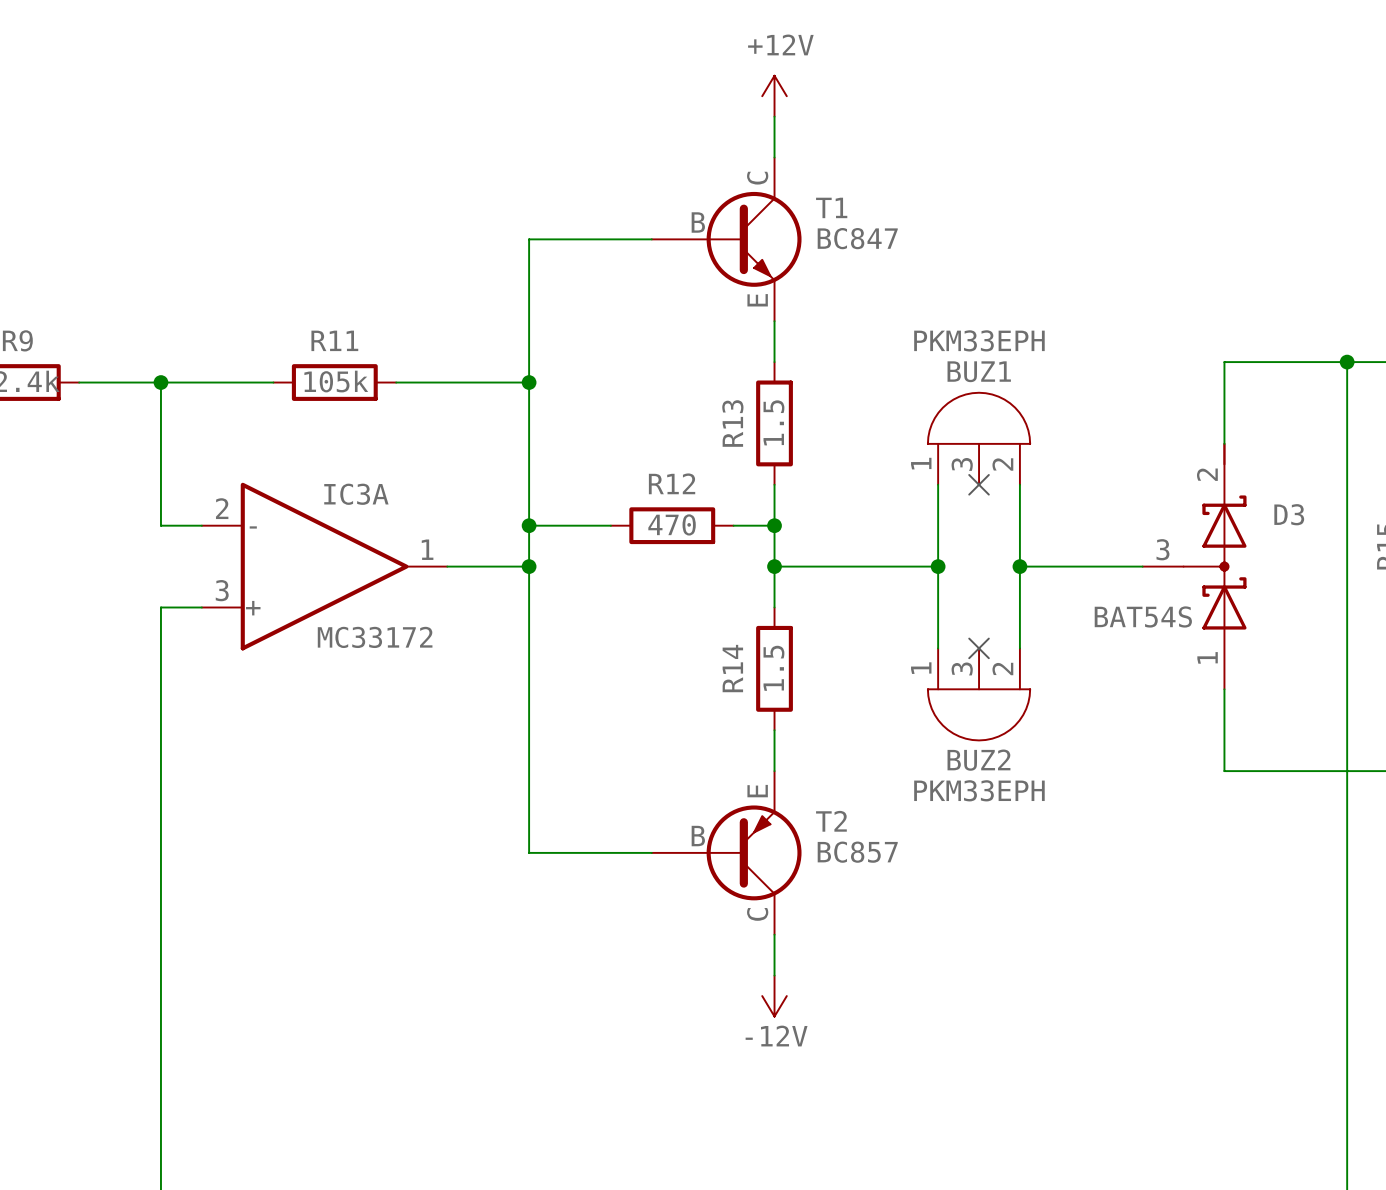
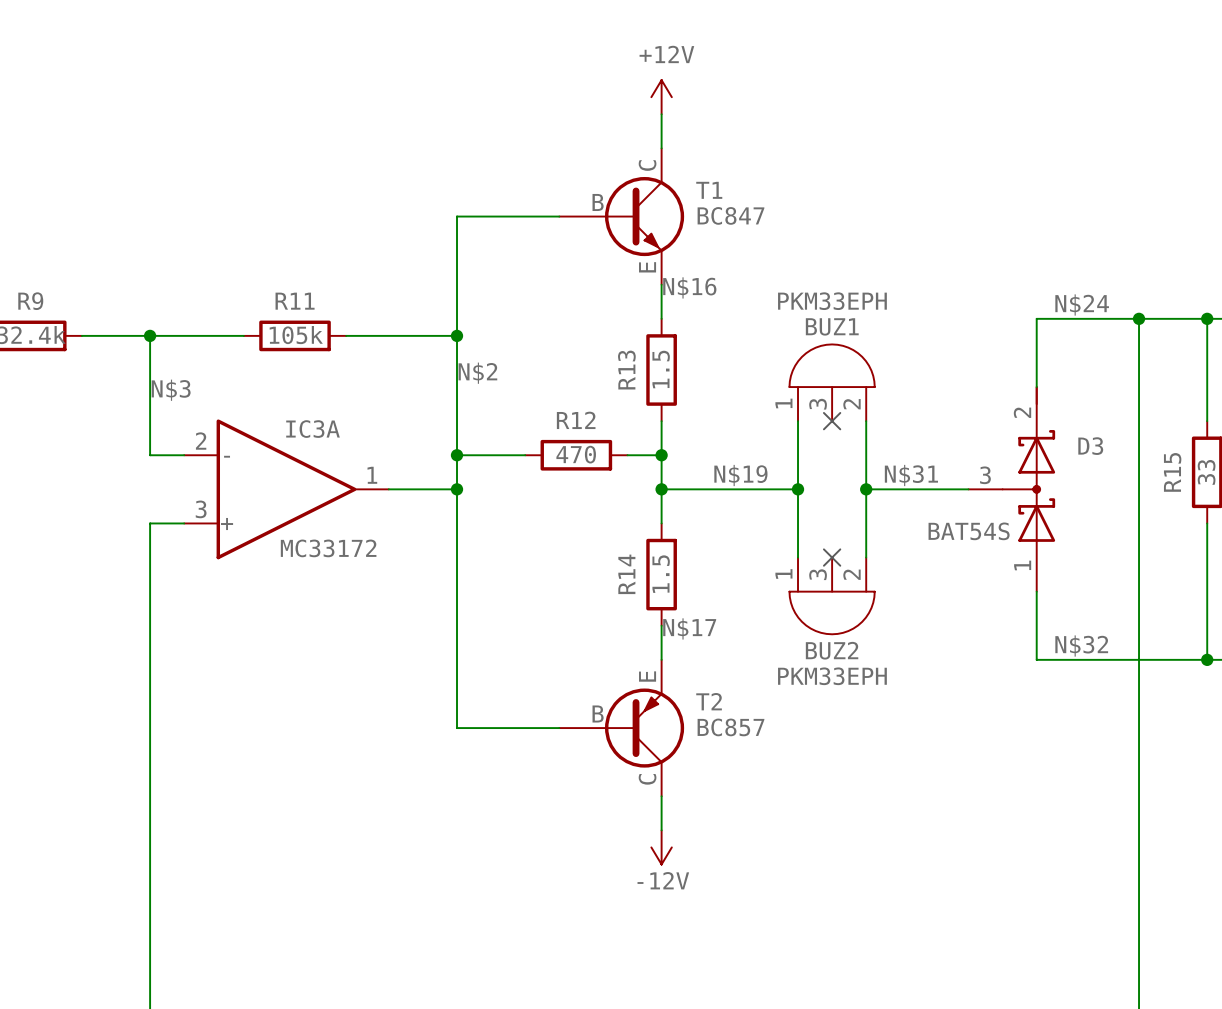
label: none -> N$16 (689, 287)
label: none -> N$24 (1082, 304)
label: none -> N$2 (477, 373)
label: none -> N$3 (171, 390)
label: none -> N$19 (740, 475)
label: none -> N$31 (911, 475)
label: none -> N$17 (689, 628)
label: none -> N$32 (1081, 646)

